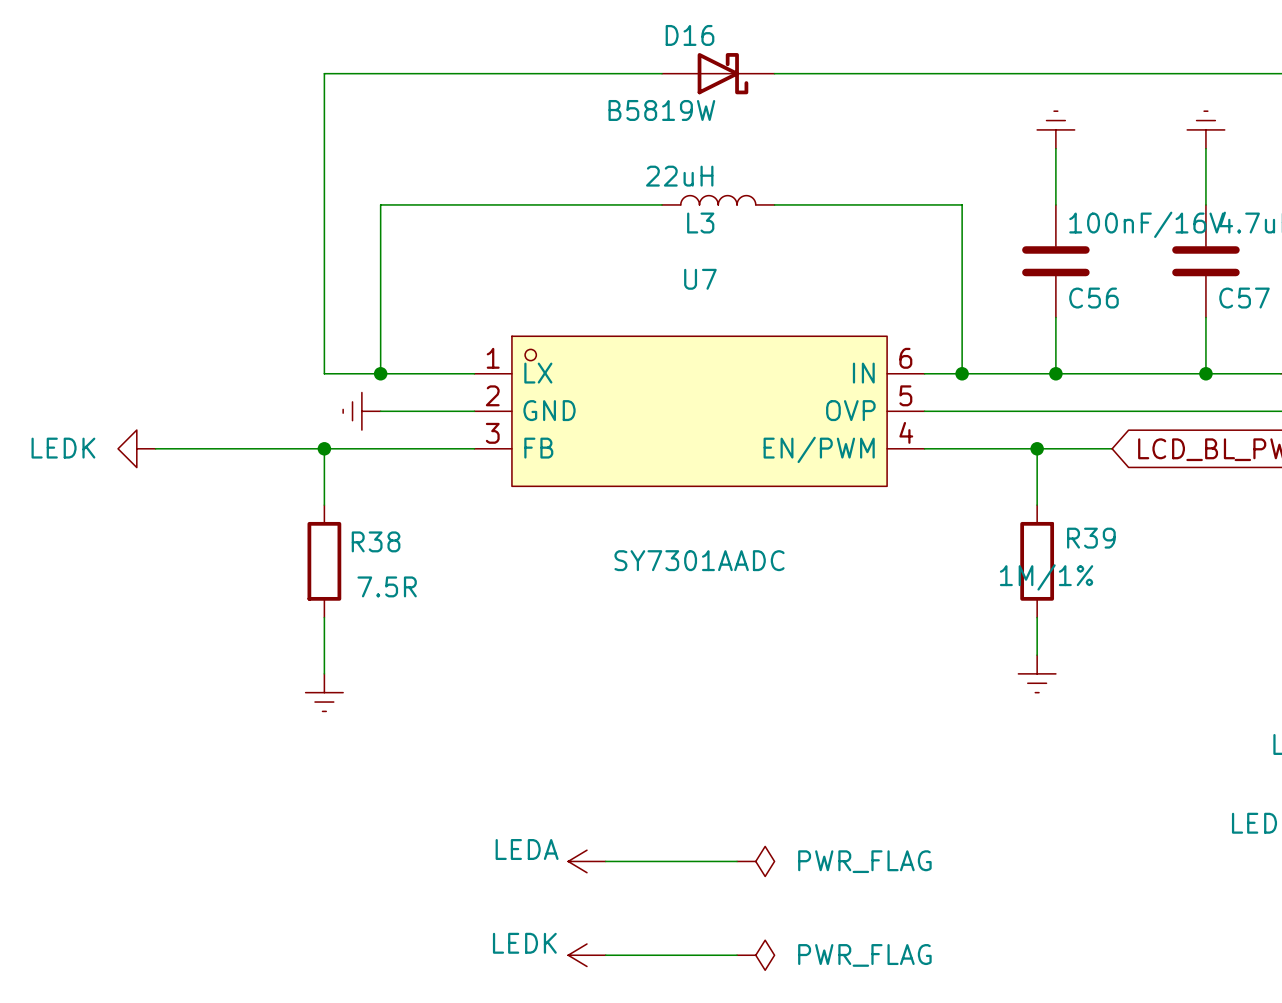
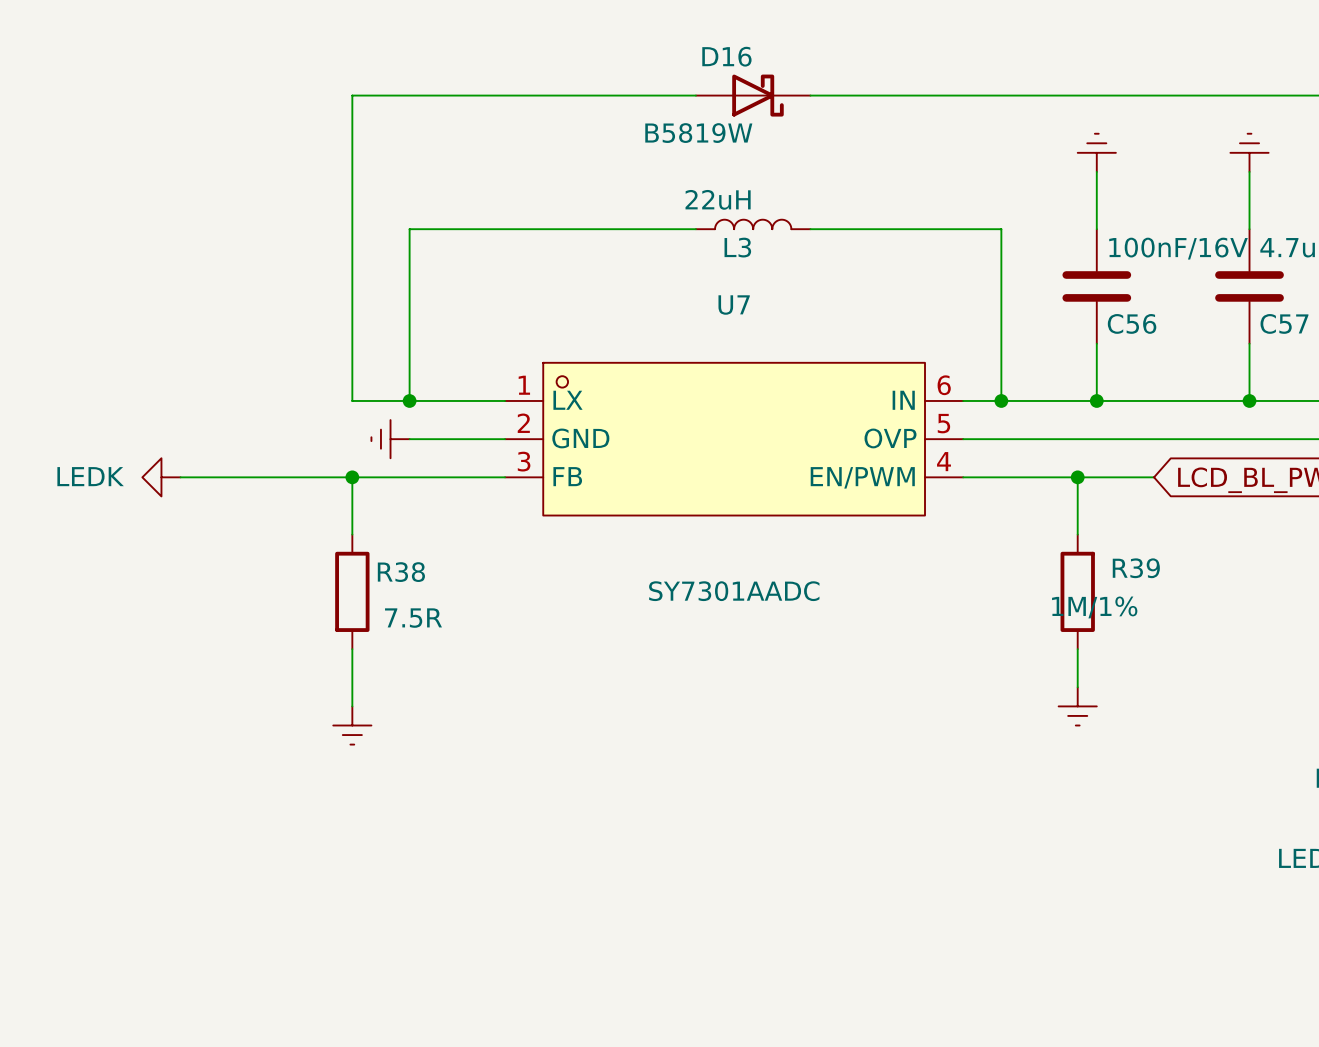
power symbol: LEDA (586, 861) -> none
wire: (605, 861) (737, 861) -> none
power symbol: PWR_FLAG (755, 861) -> none
power symbol: LEDK (586, 955) -> none
wire: (605, 955) (737, 955) -> none
power symbol: PWR_FLAG (755, 955) -> none

